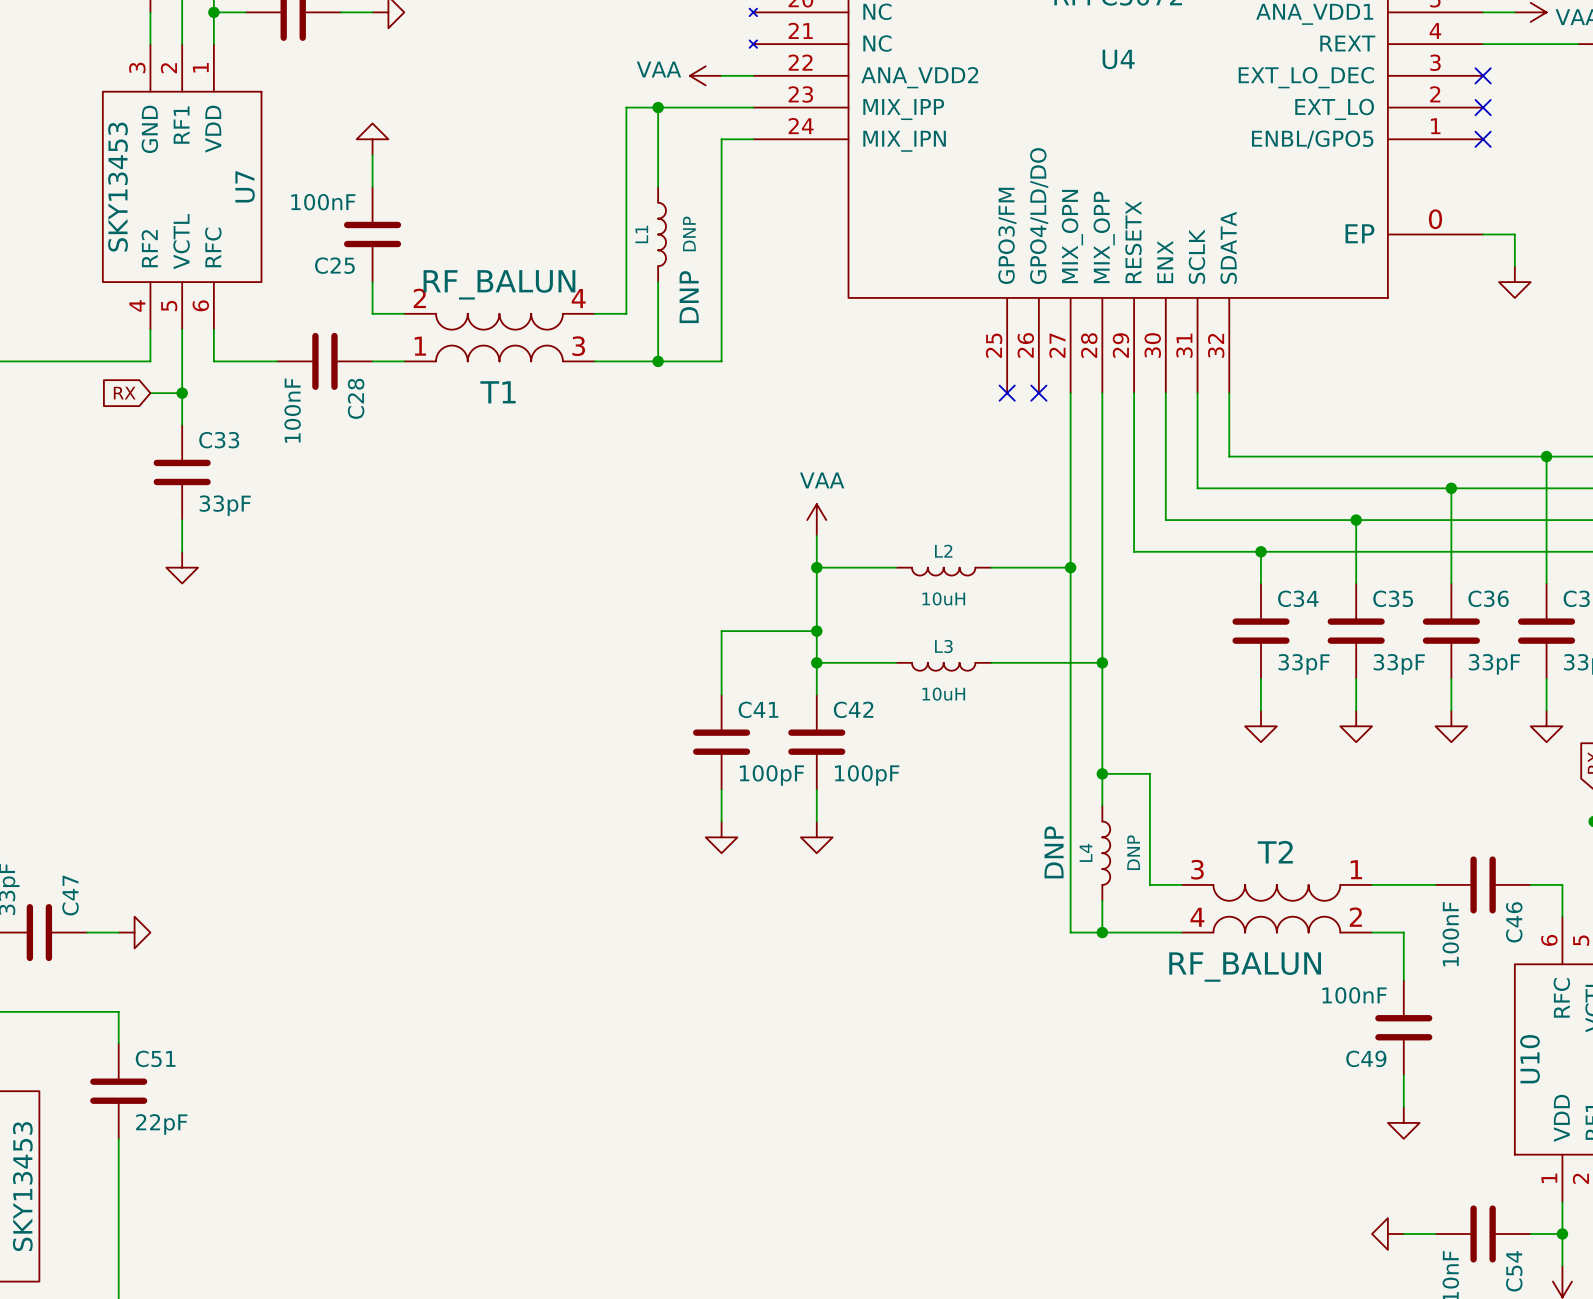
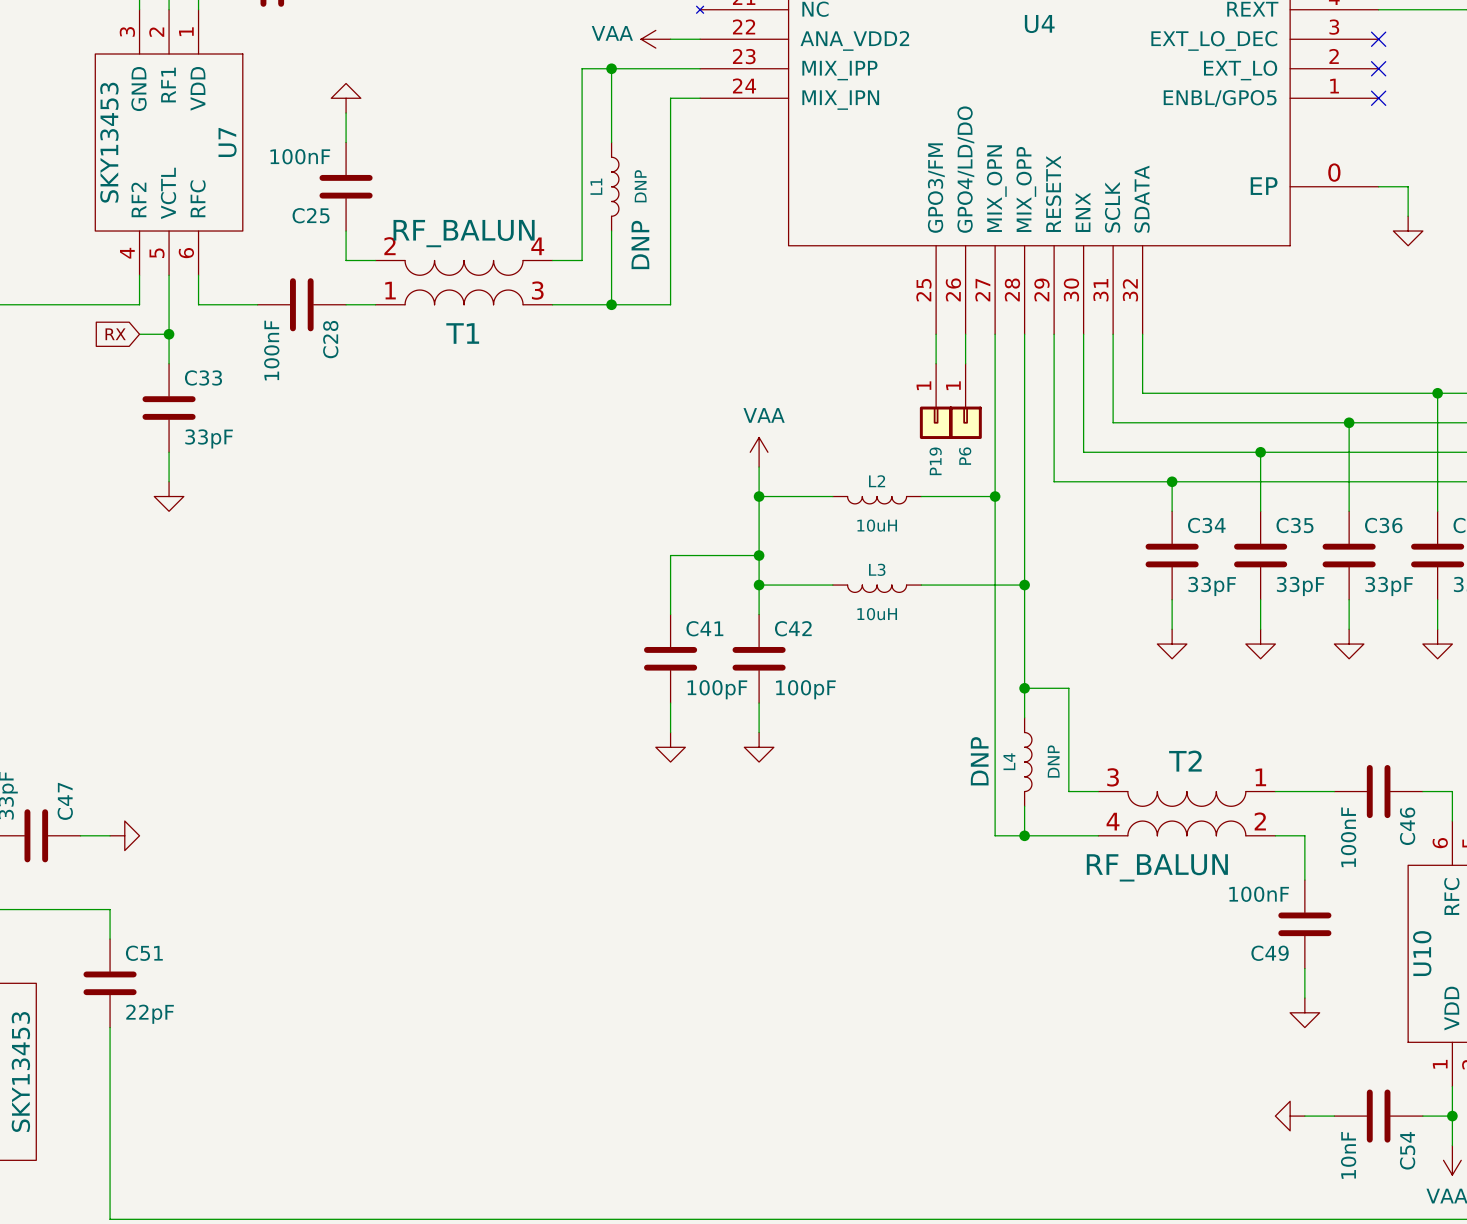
wire: none -> (936, 334) (936, 363)
no-connect mark: (1007, 393) -> none
wire: none -> (965, 334) (965, 363)
no-connect mark: (1038, 393) -> none
P19: none -> (936, 401)
P6: none -> (965, 401)

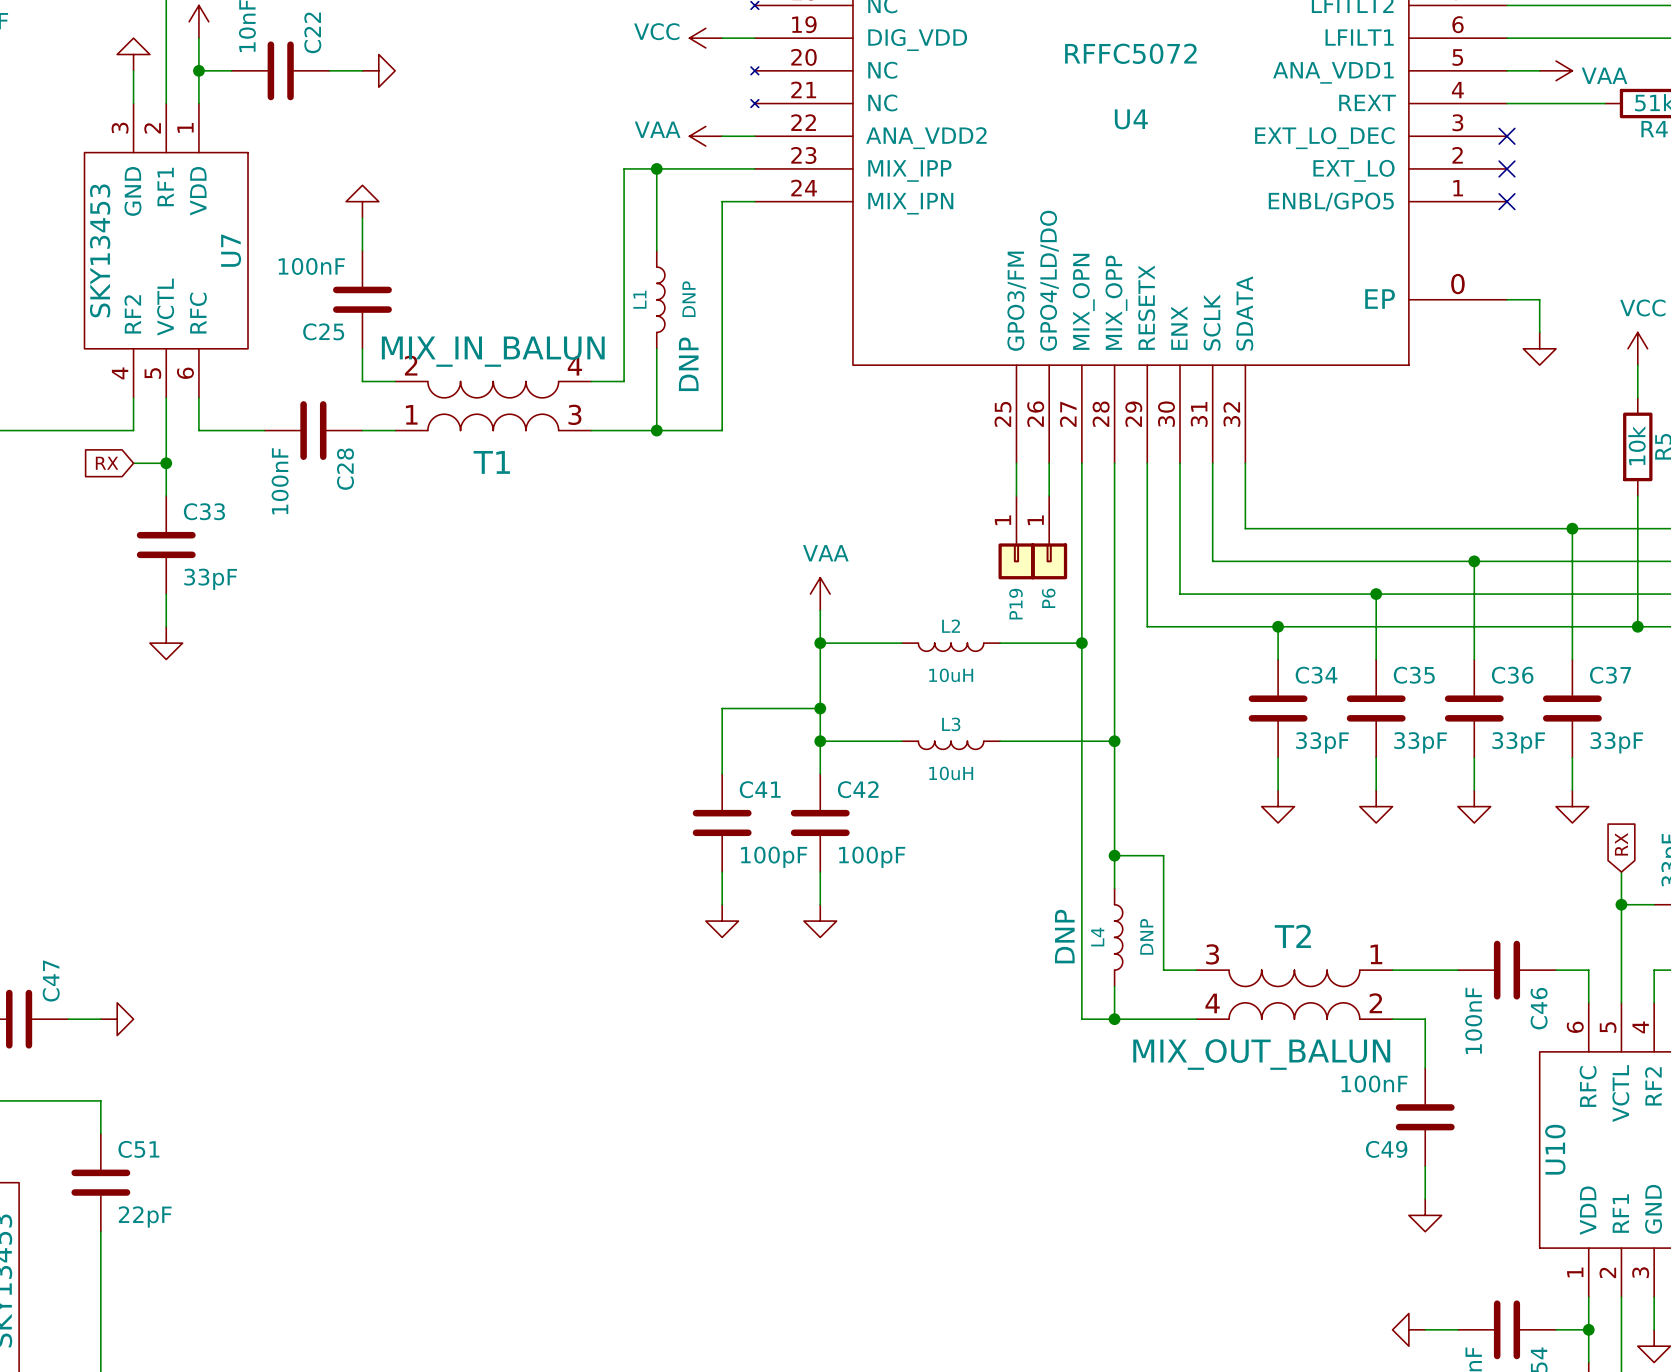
T1 value: RF_BALUN (464, 233) -> MIX_IN_BALUN (493, 351)
T2 value: RF_BALUN (1157, 867) -> MIX_OUT_BALUN (1261, 1054)

